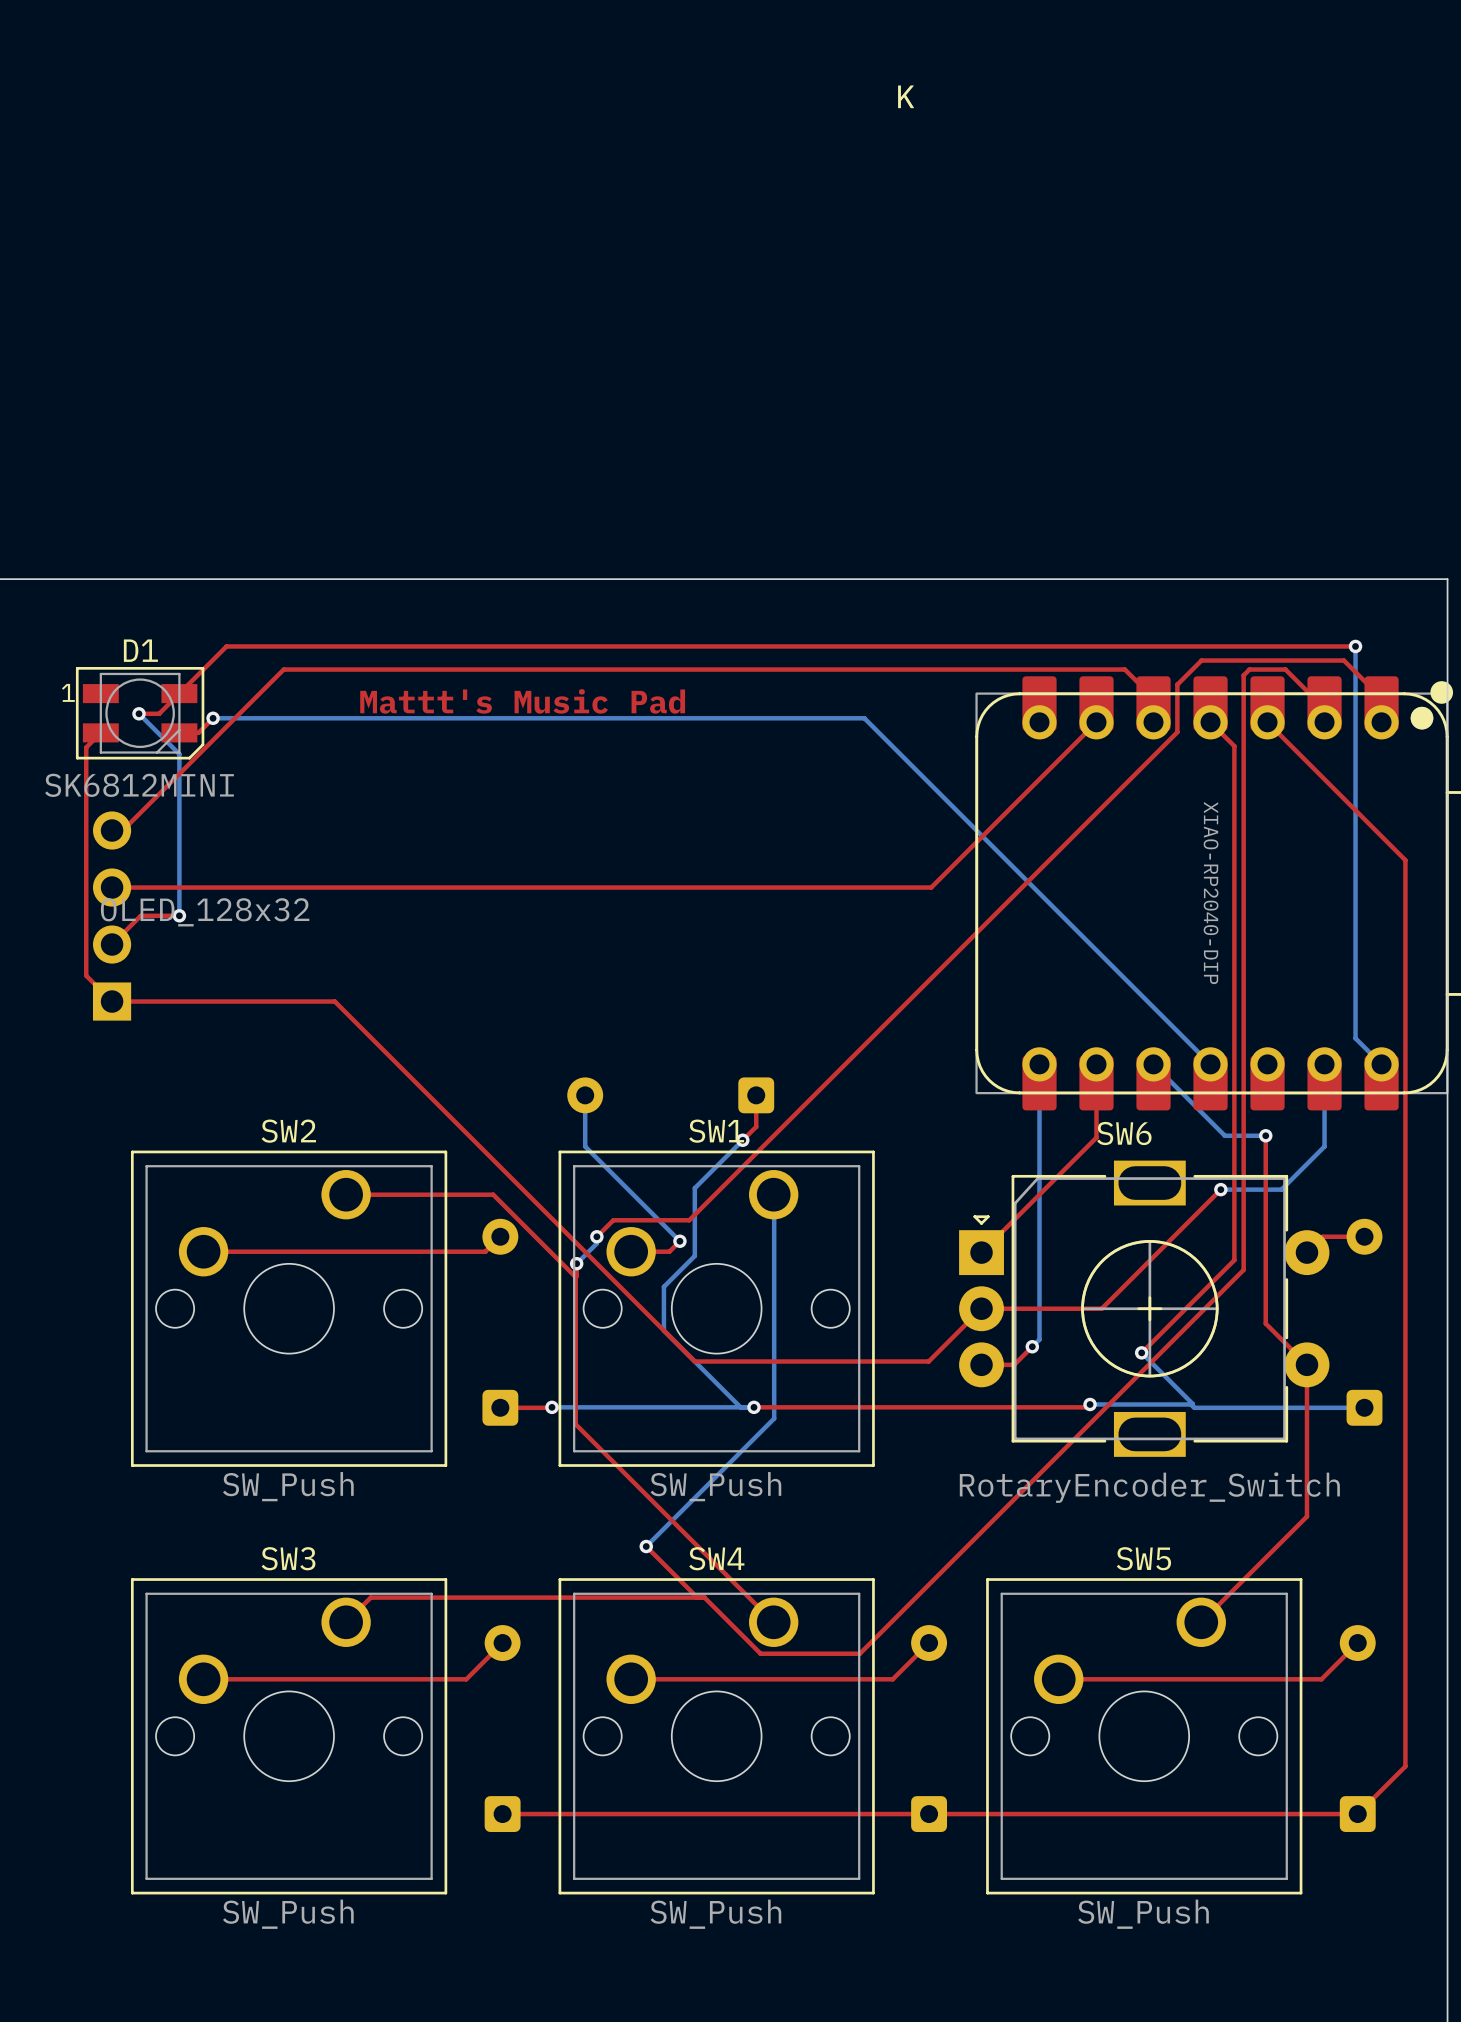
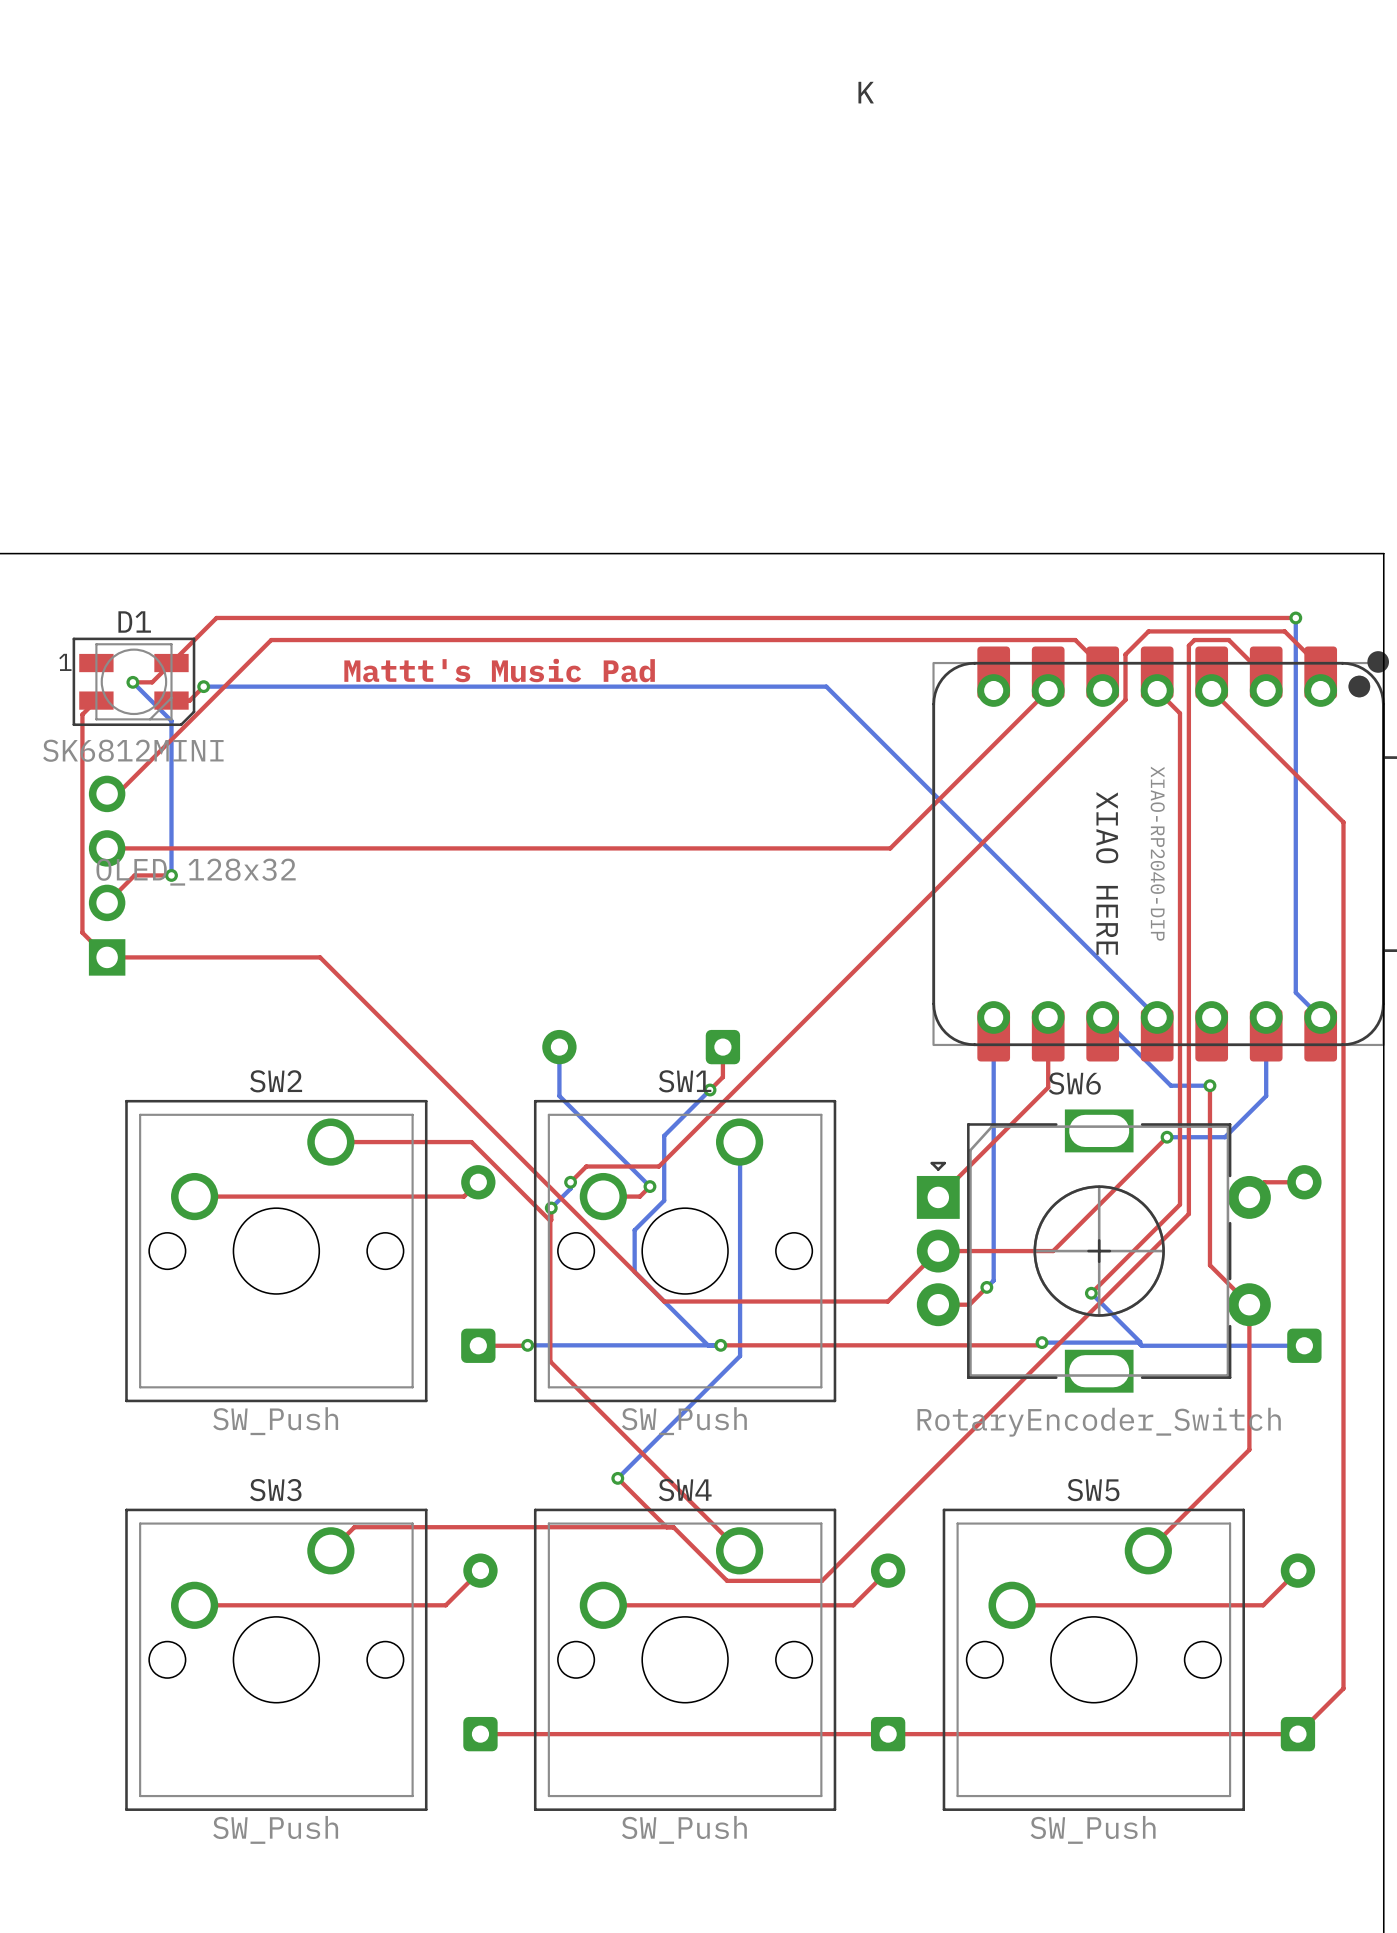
text: none -> XIAO HERE (1107, 873)

